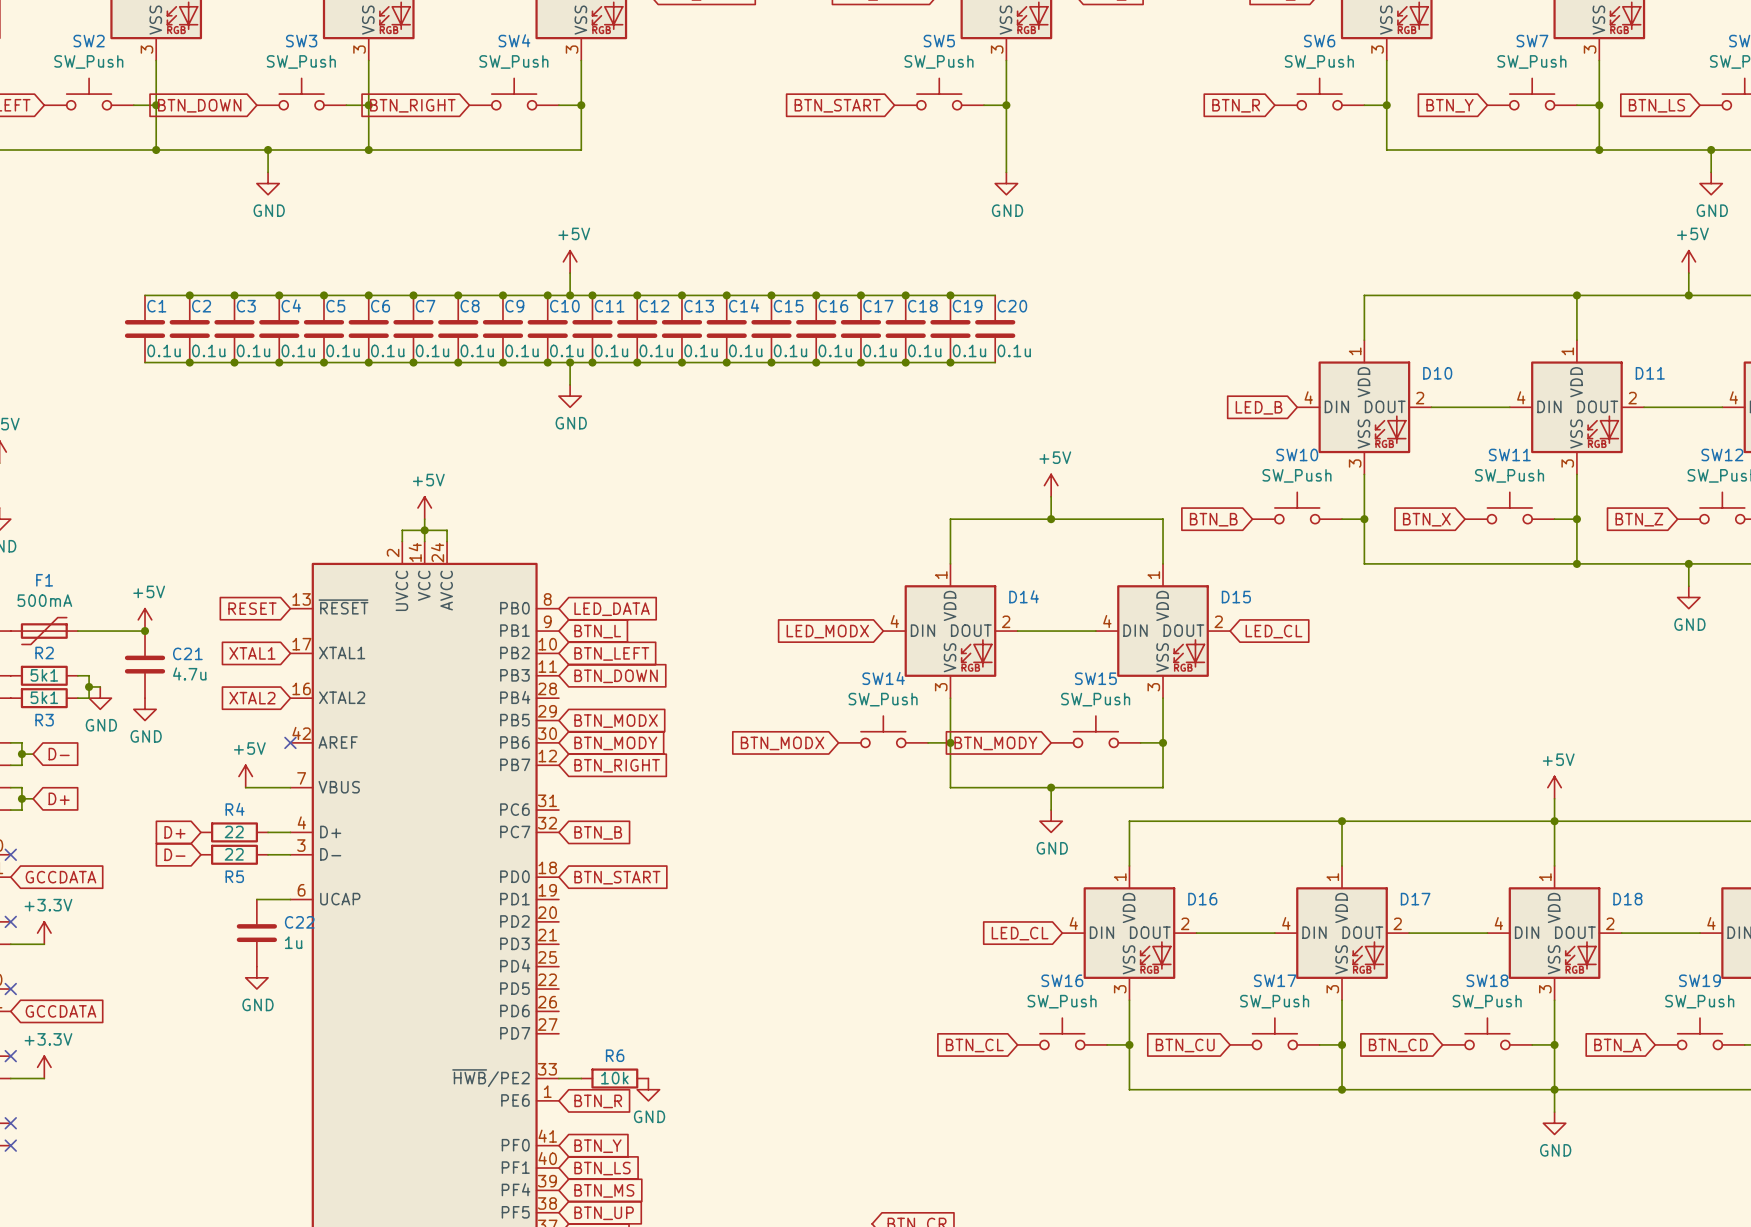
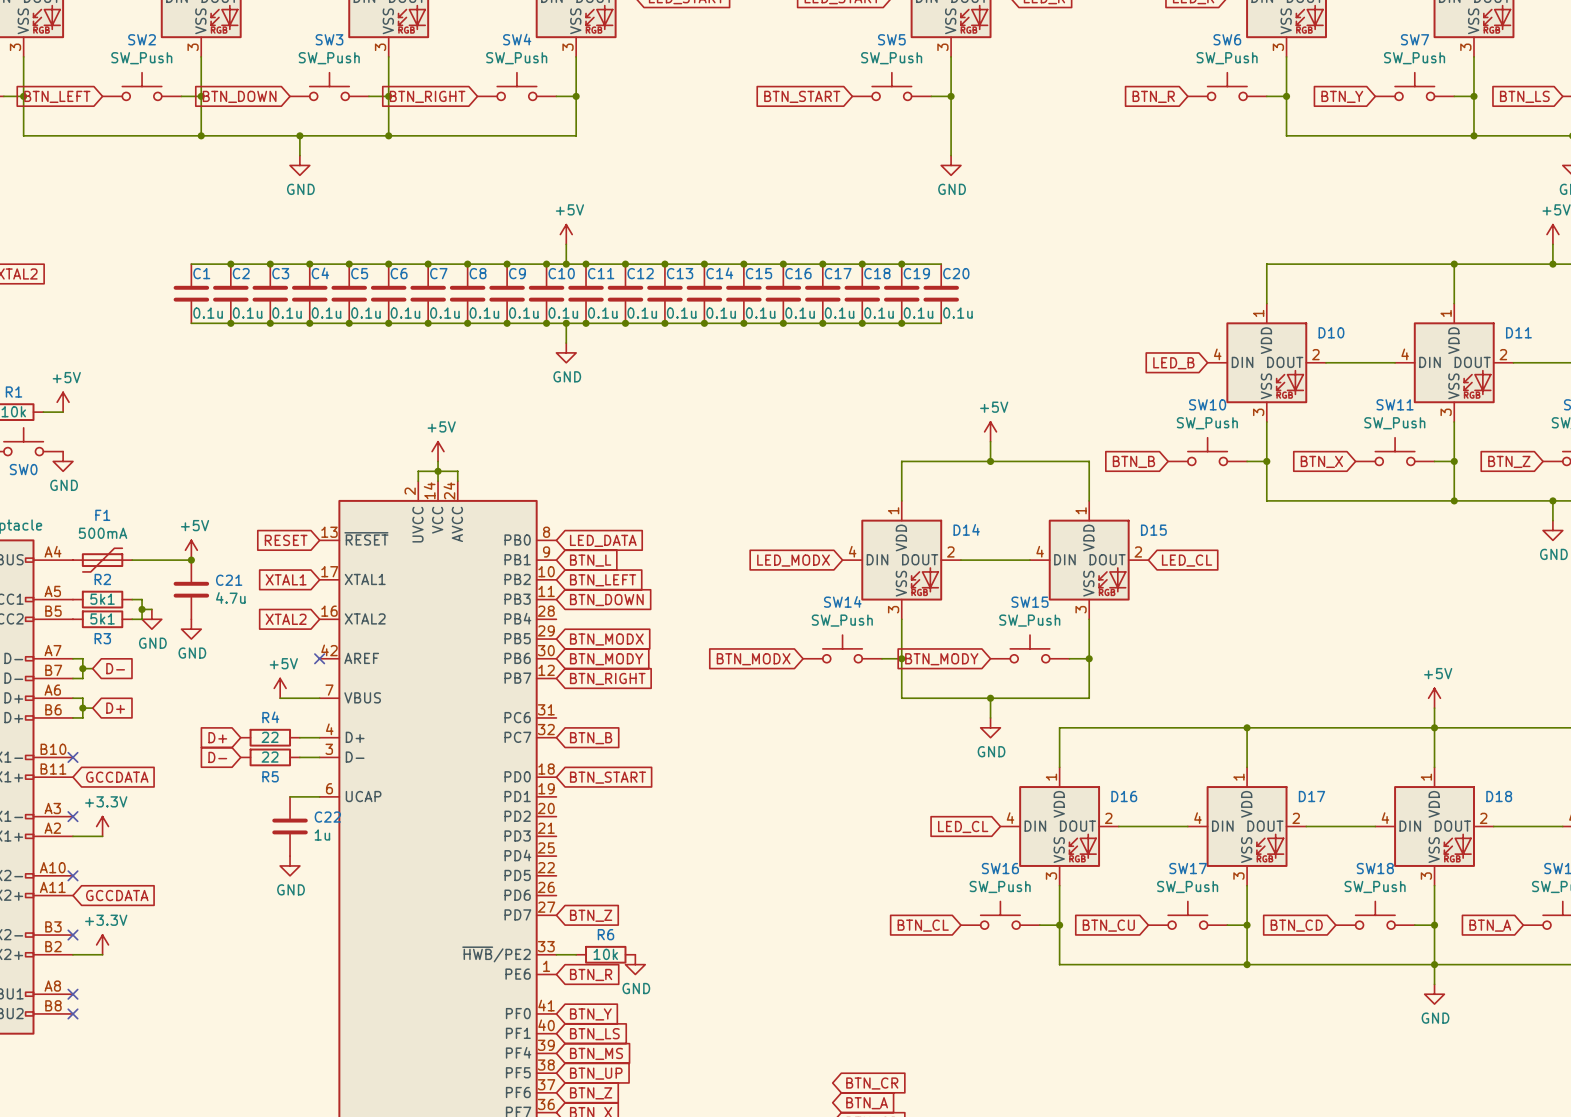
global label: none -> BTN_Z (591, 915)

